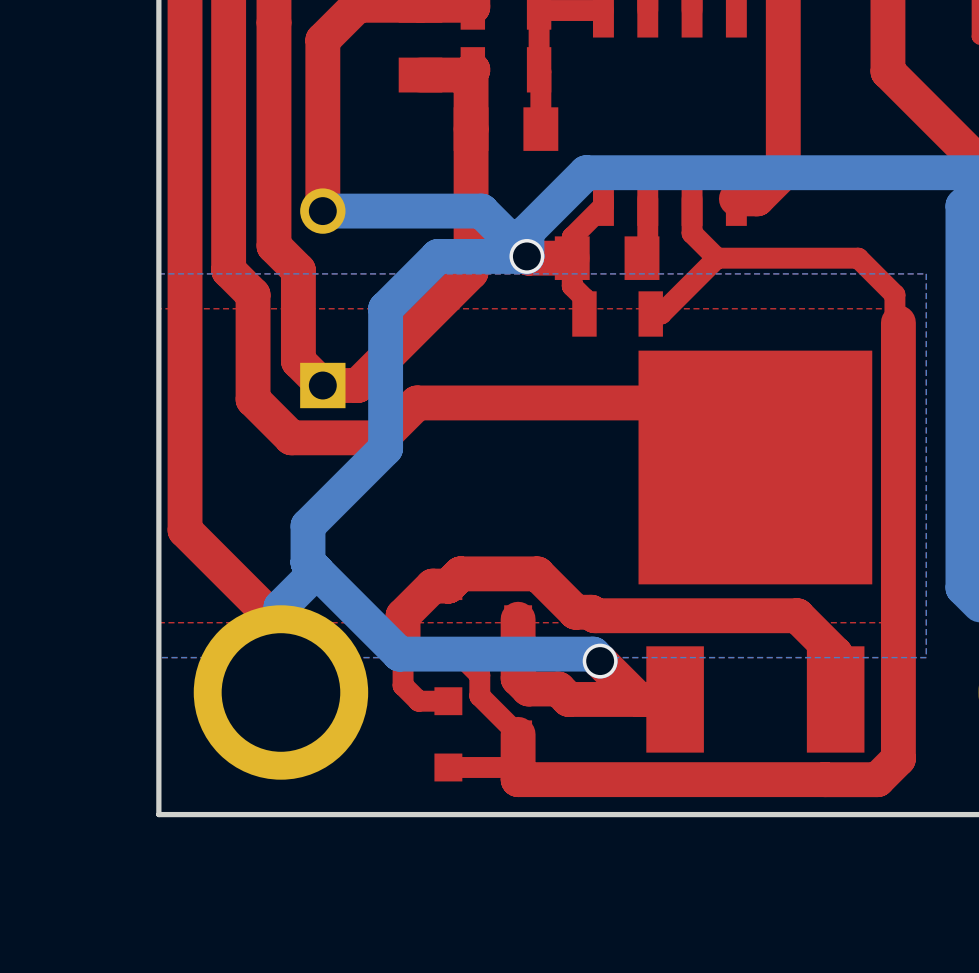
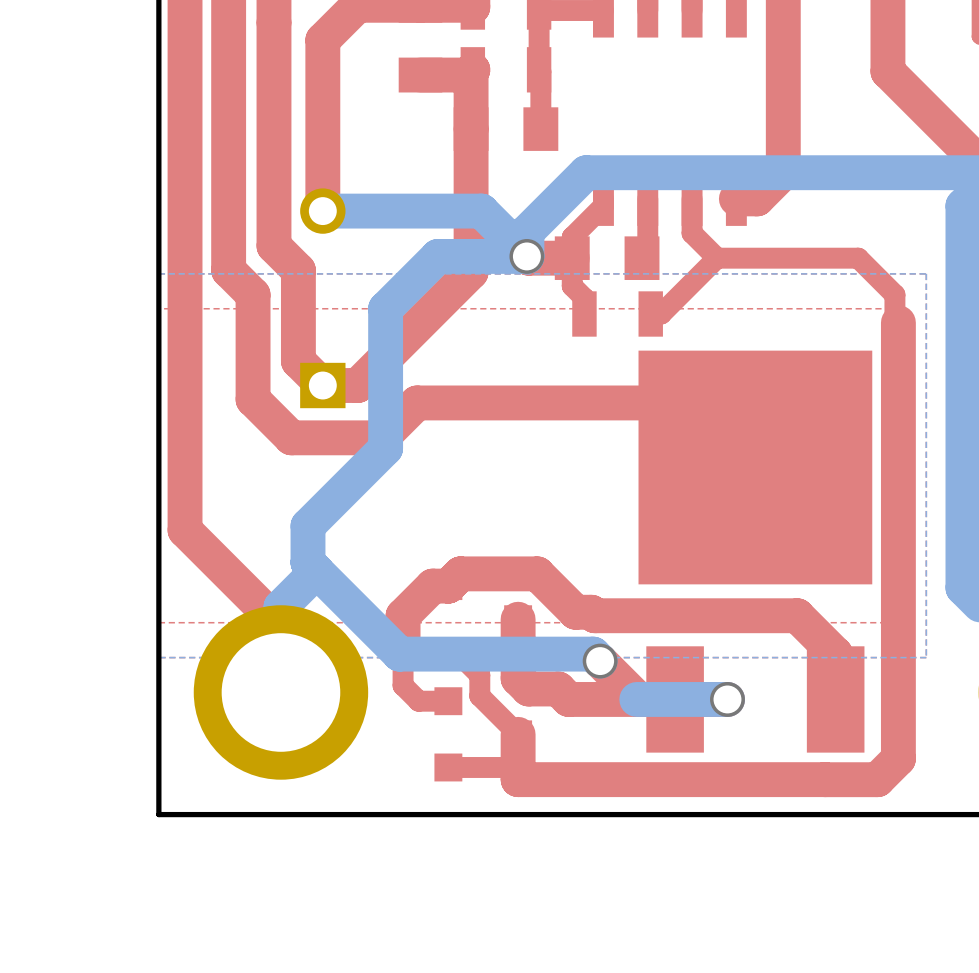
bottom track: none -> (727, 699) (636, 699)
via: none -> (727, 699)

